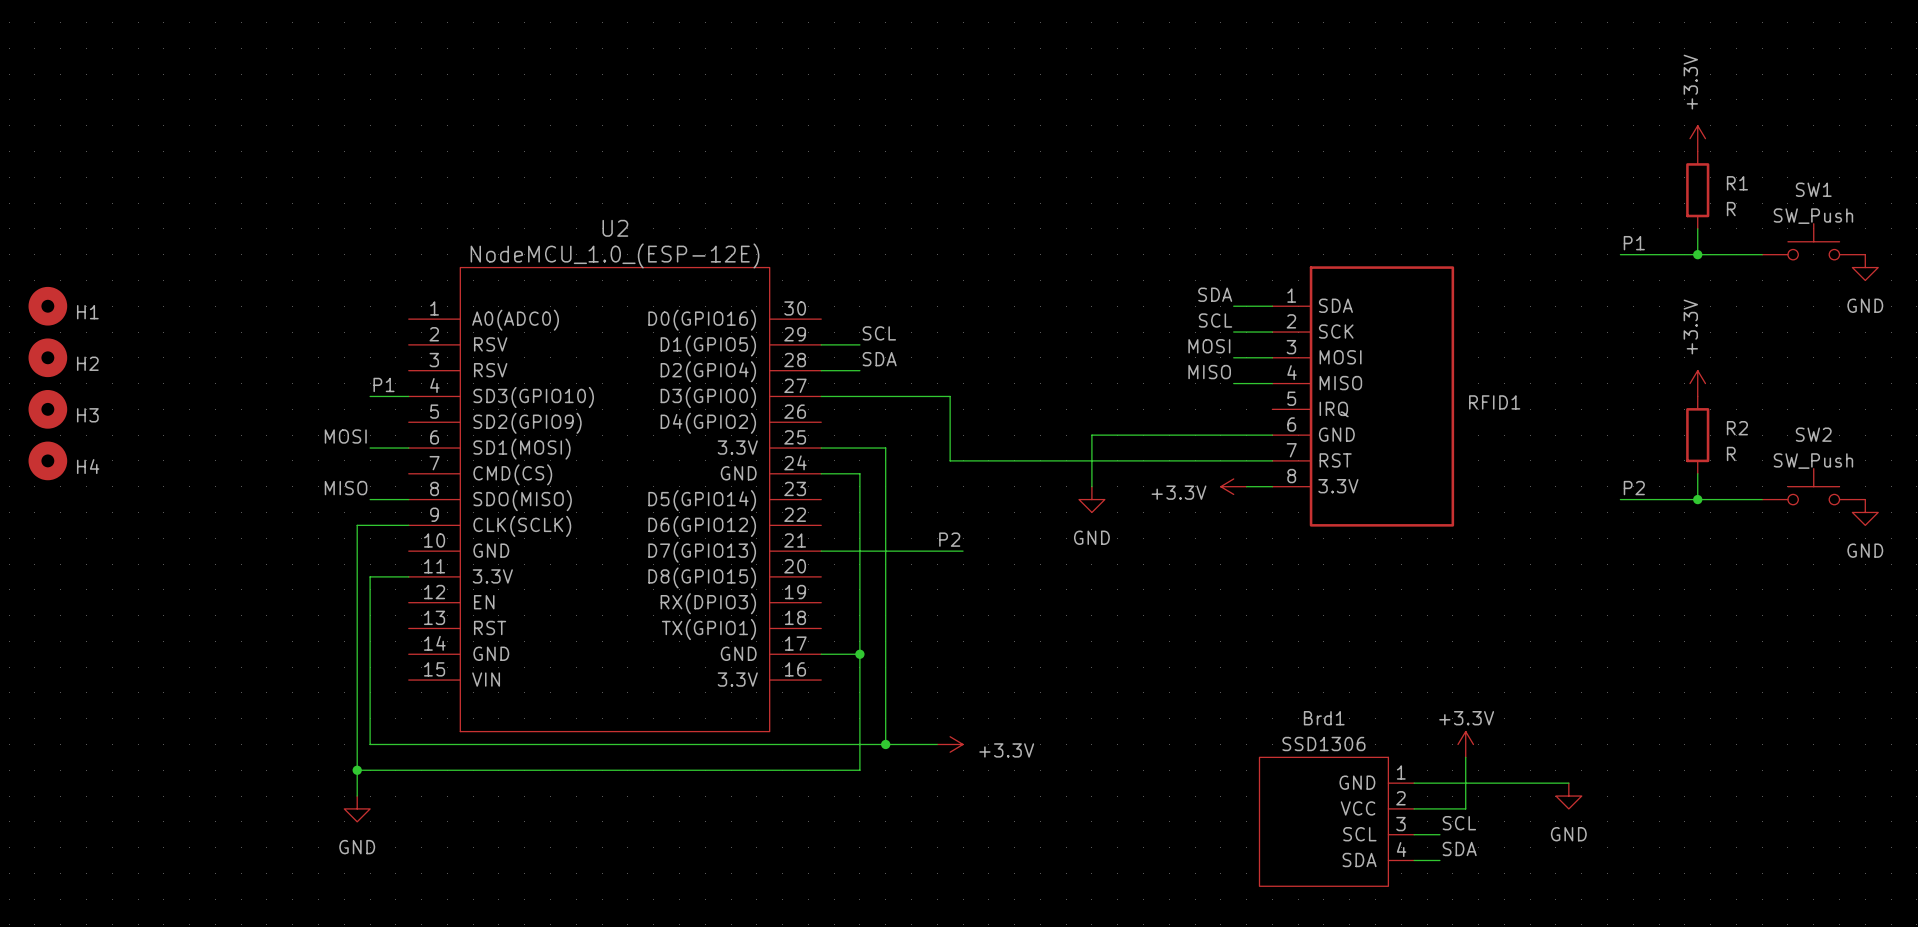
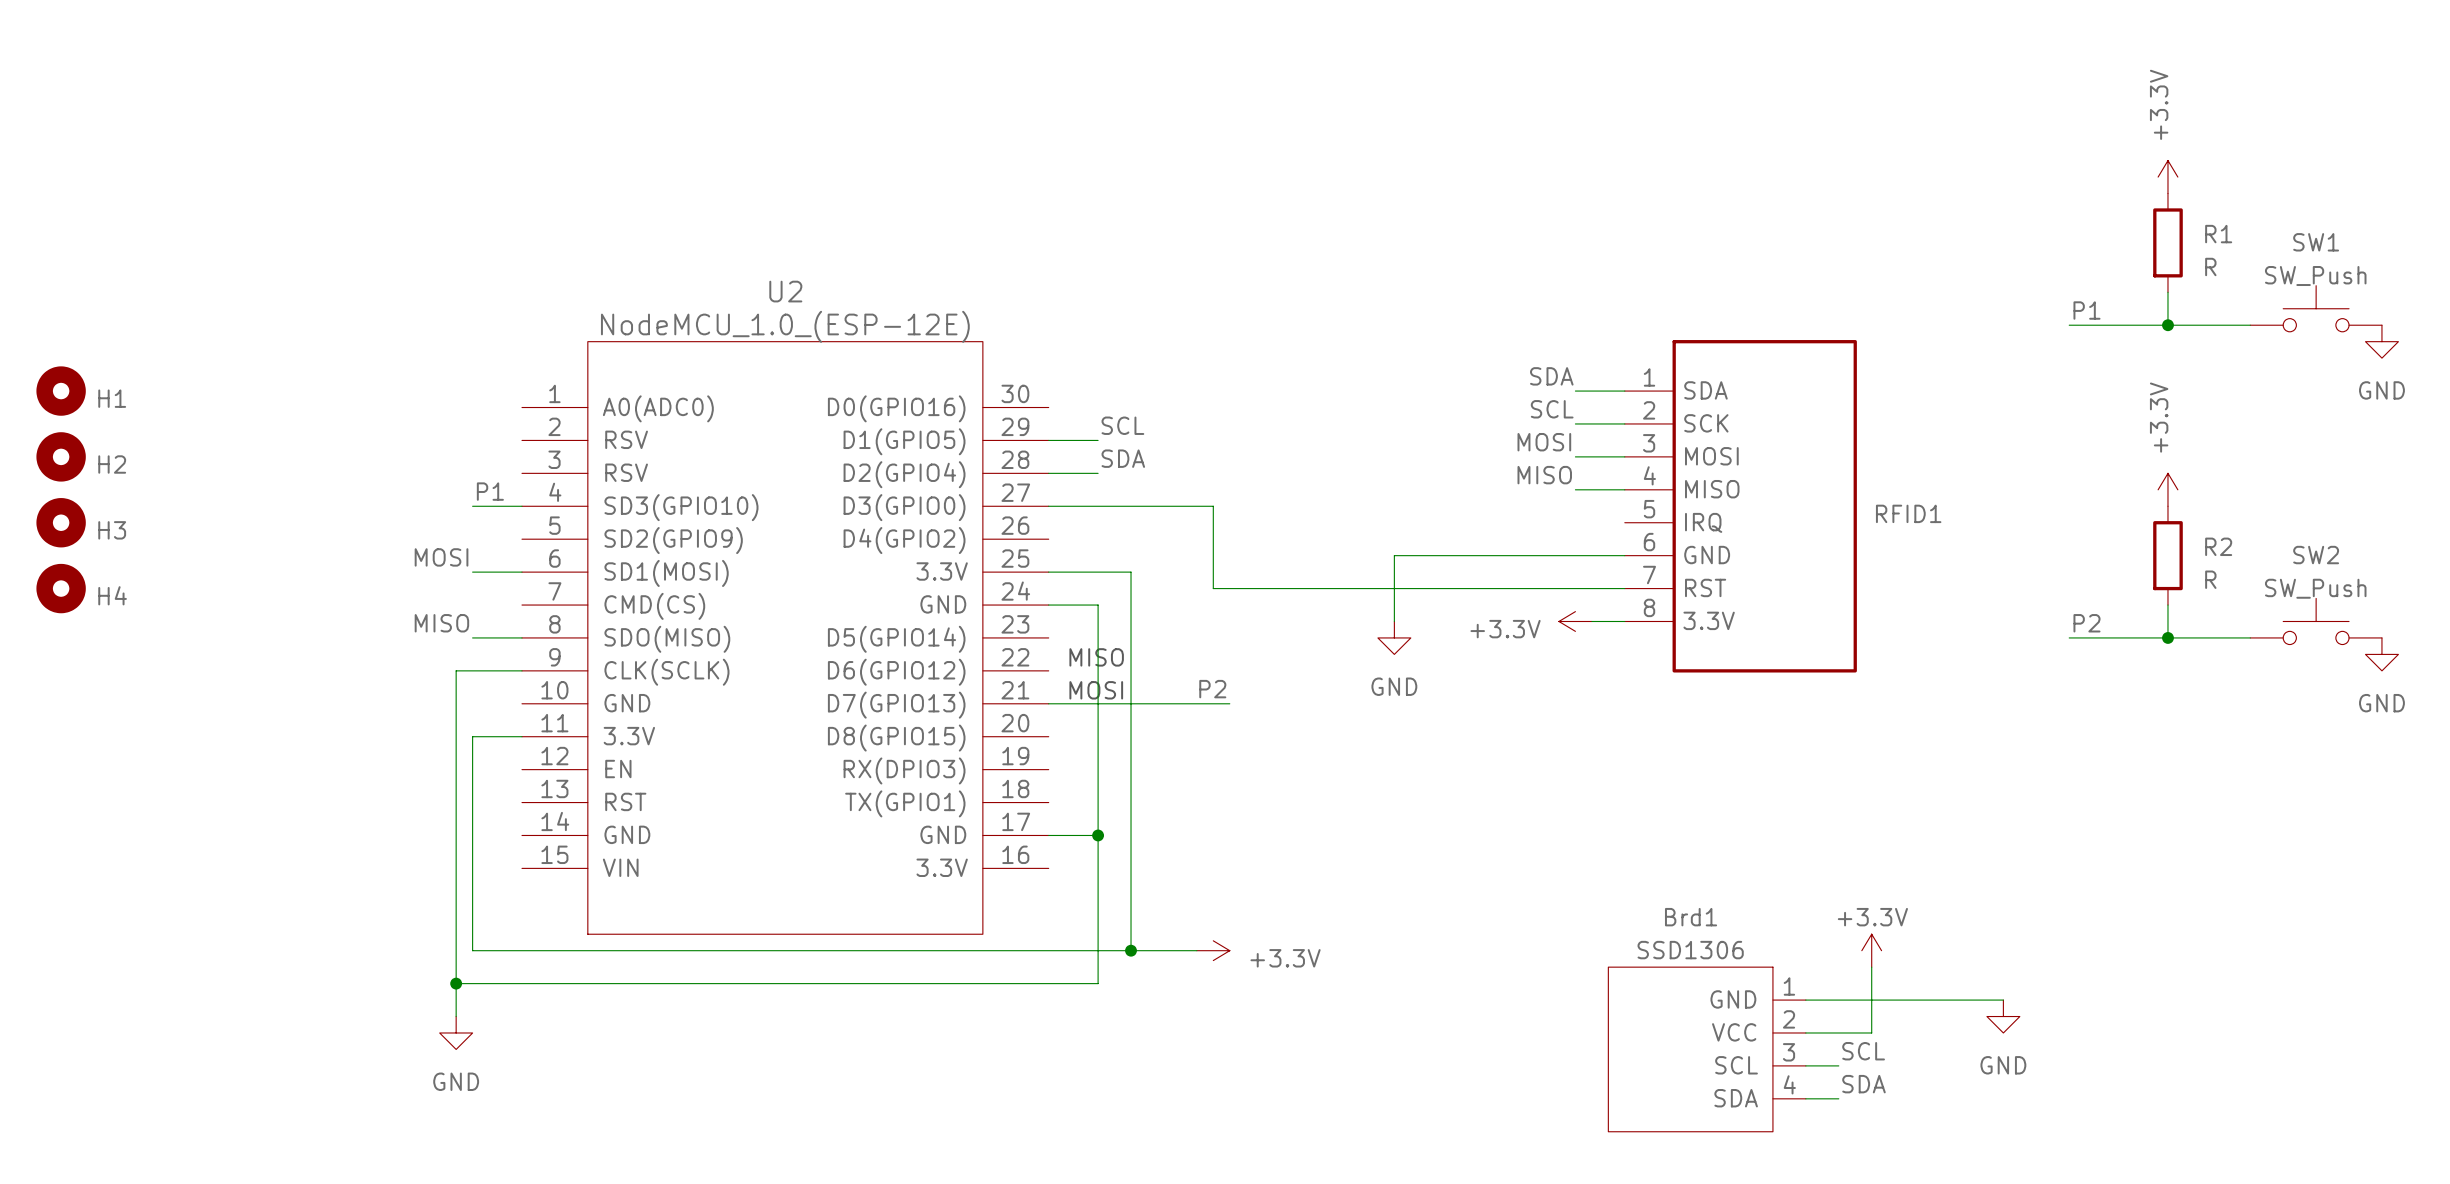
text: none -> MISO (1096, 657)
text: none -> MOSI (1096, 690)

